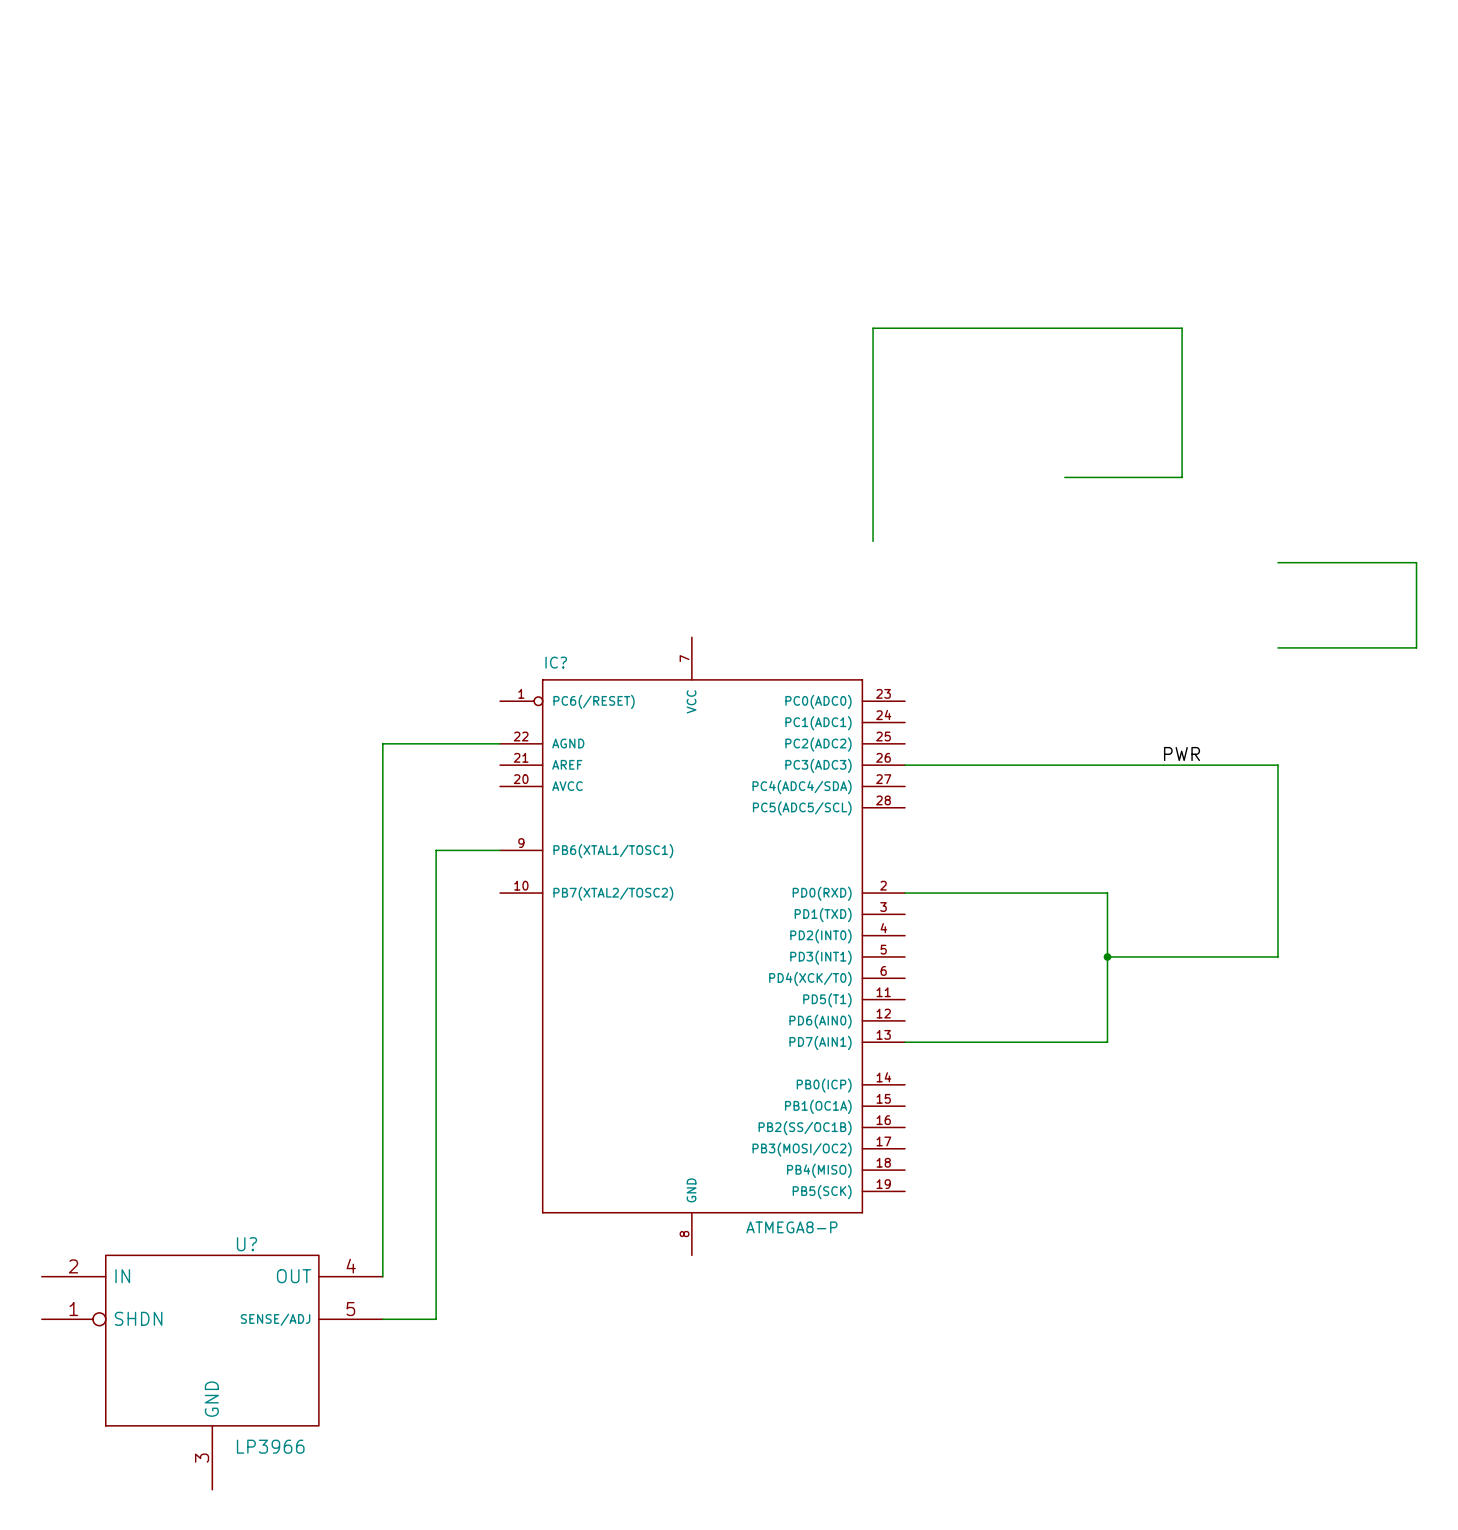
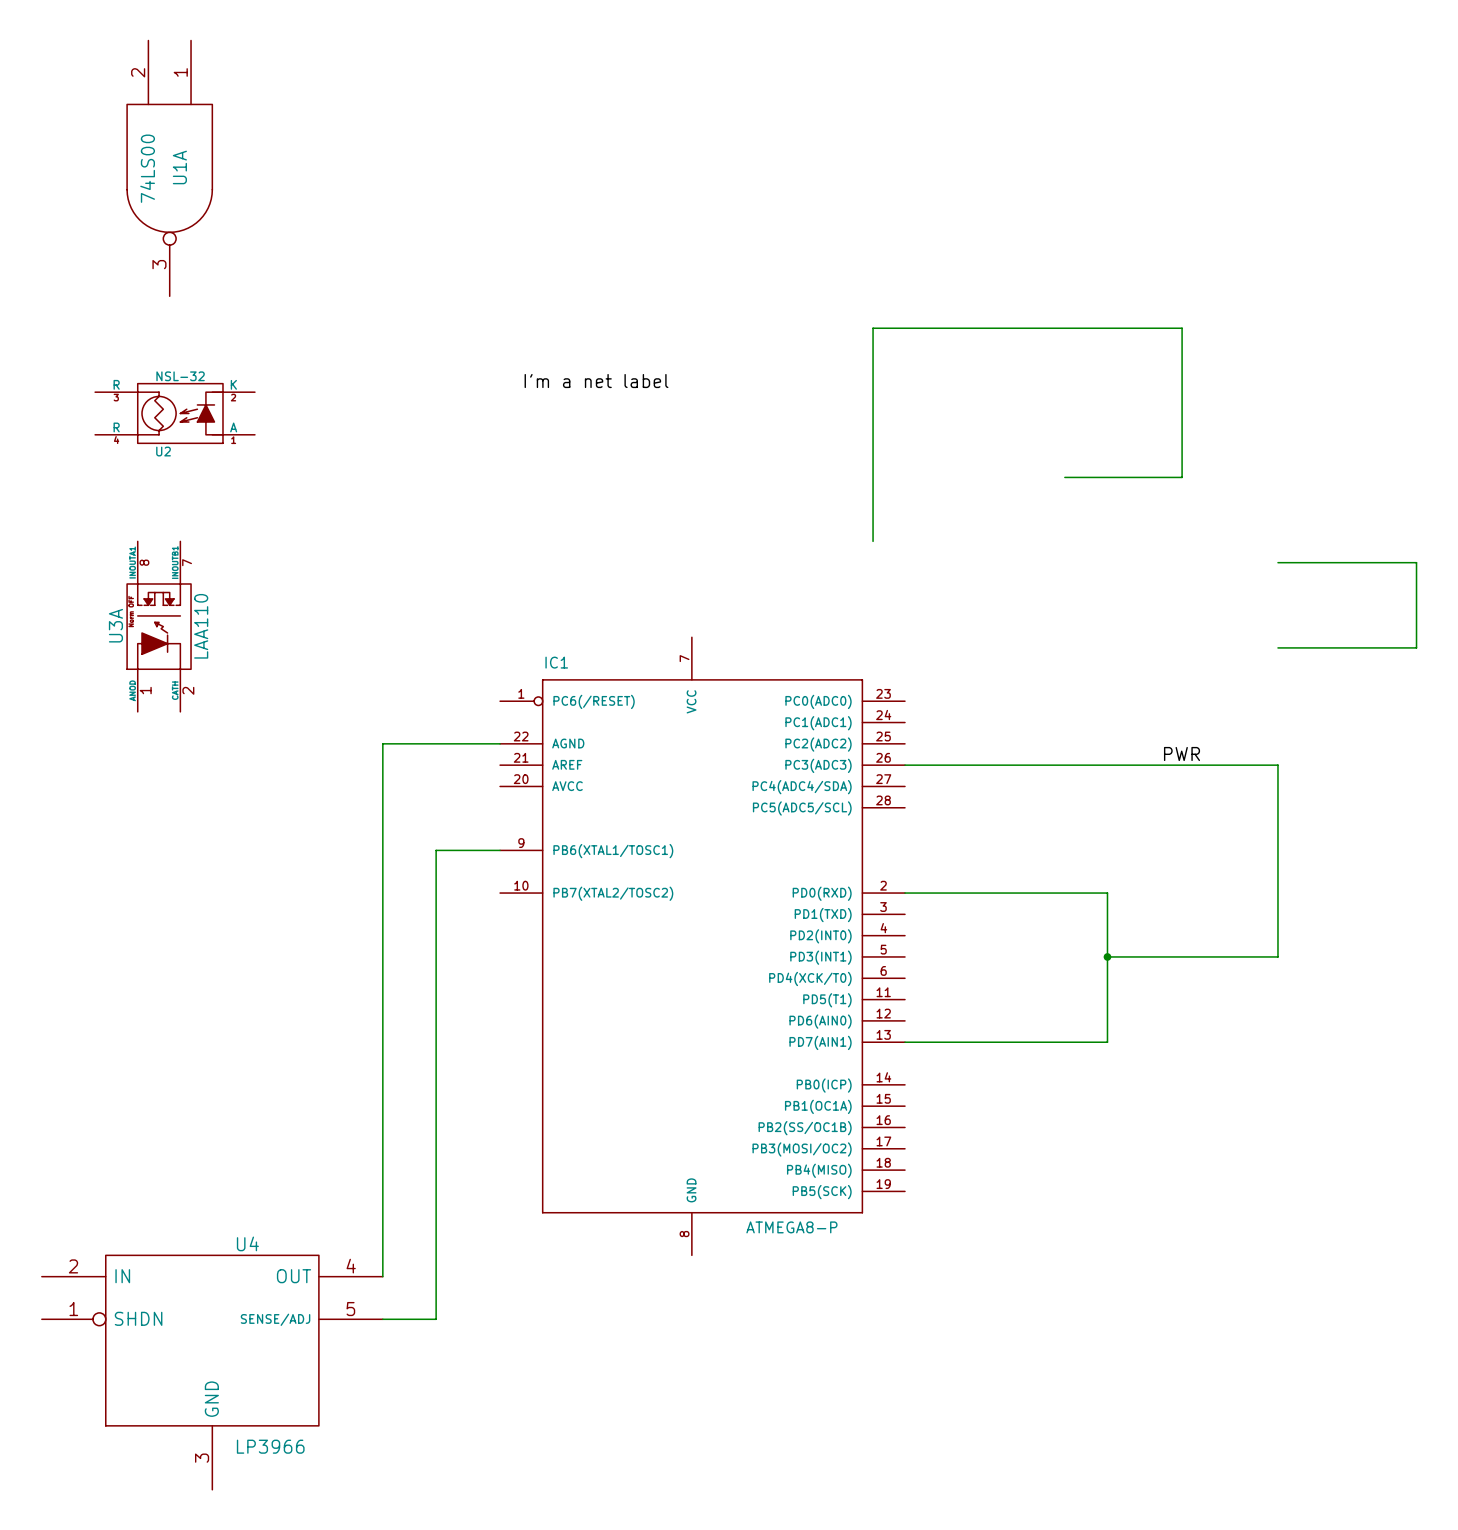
U1A: none -> 74LS00 (169, 168)
label: none -> I'm a net label (596, 381)
U2: none -> NSL-32 (175, 413)
U3A: none -> LAA110 (159, 626)
IC? name: IC? (556, 662) -> IC1 (556, 662)
U? name: U? (246, 1244) -> U4 (247, 1243)

